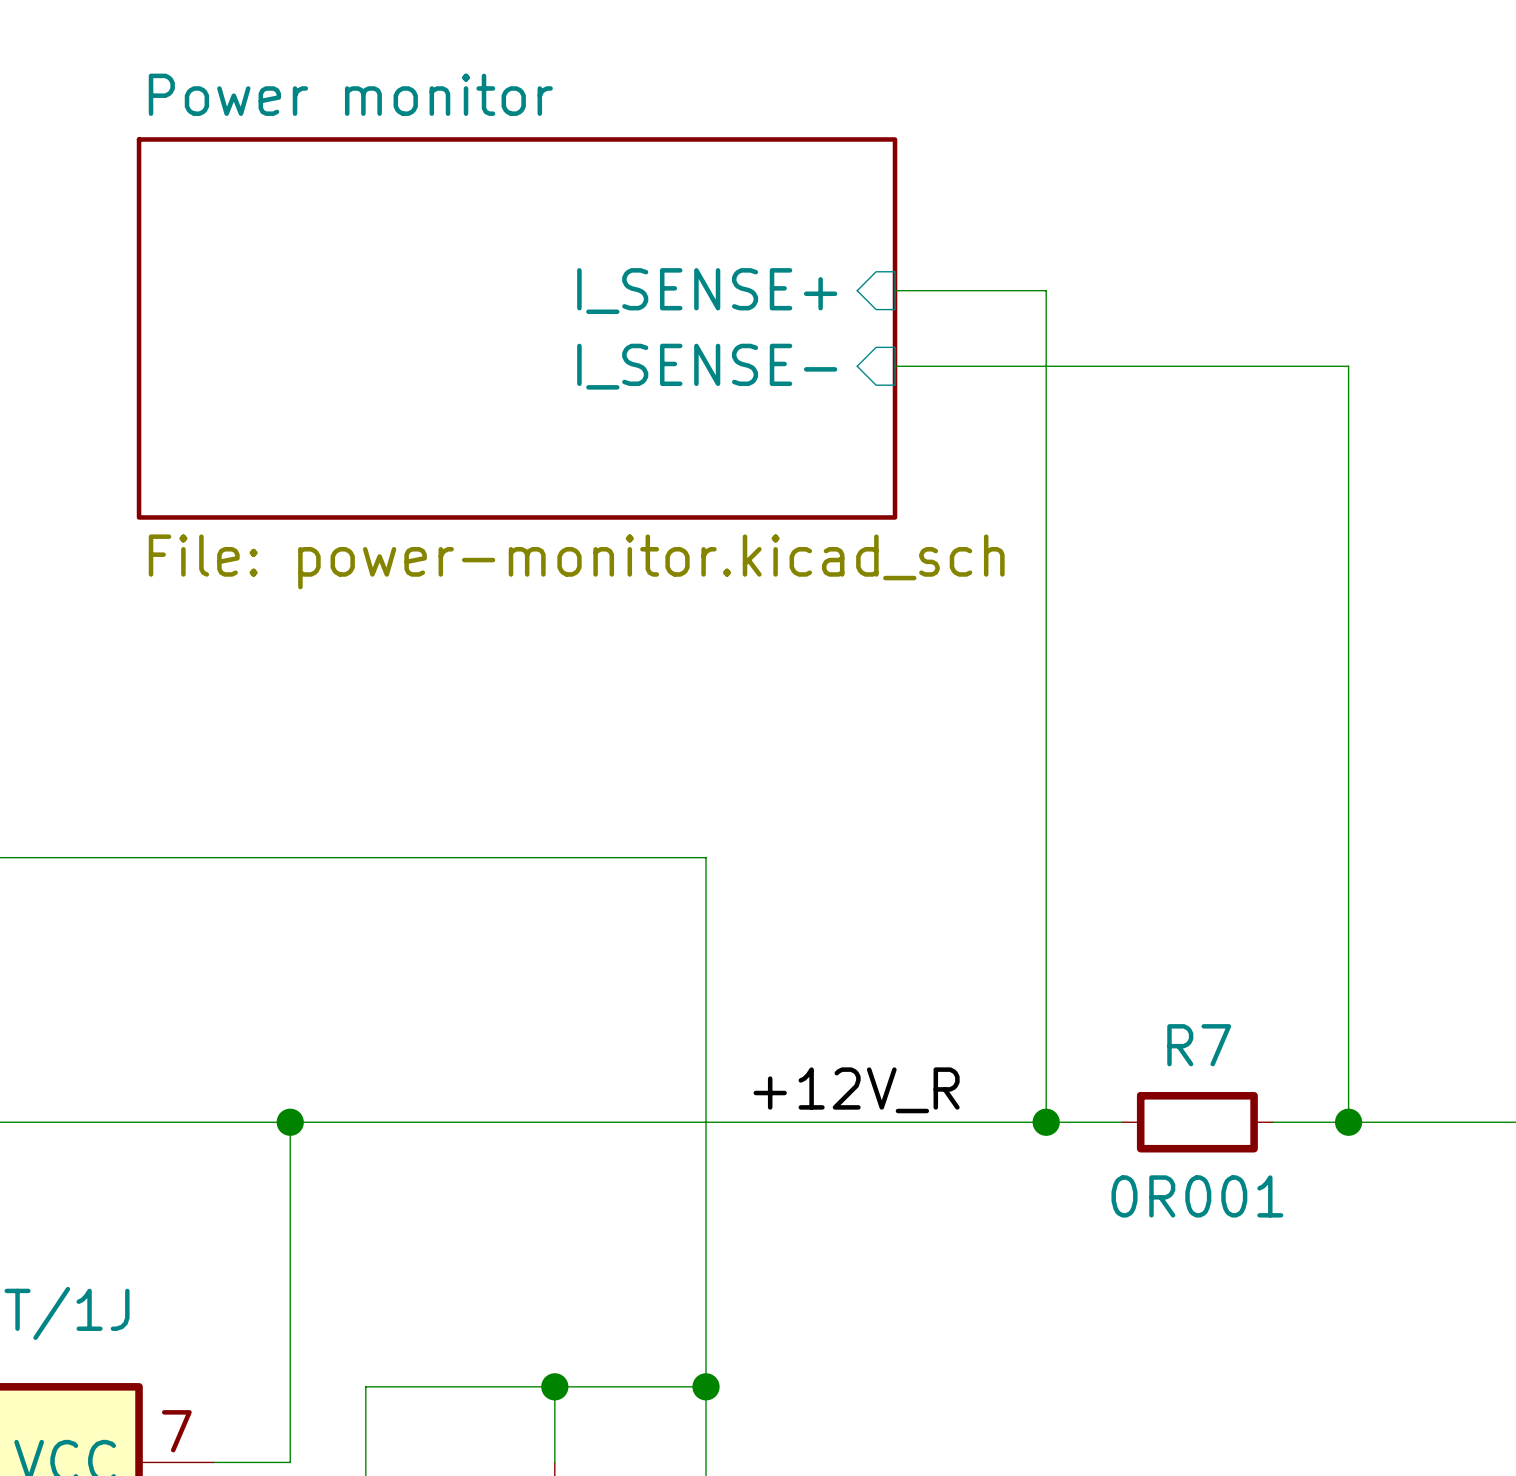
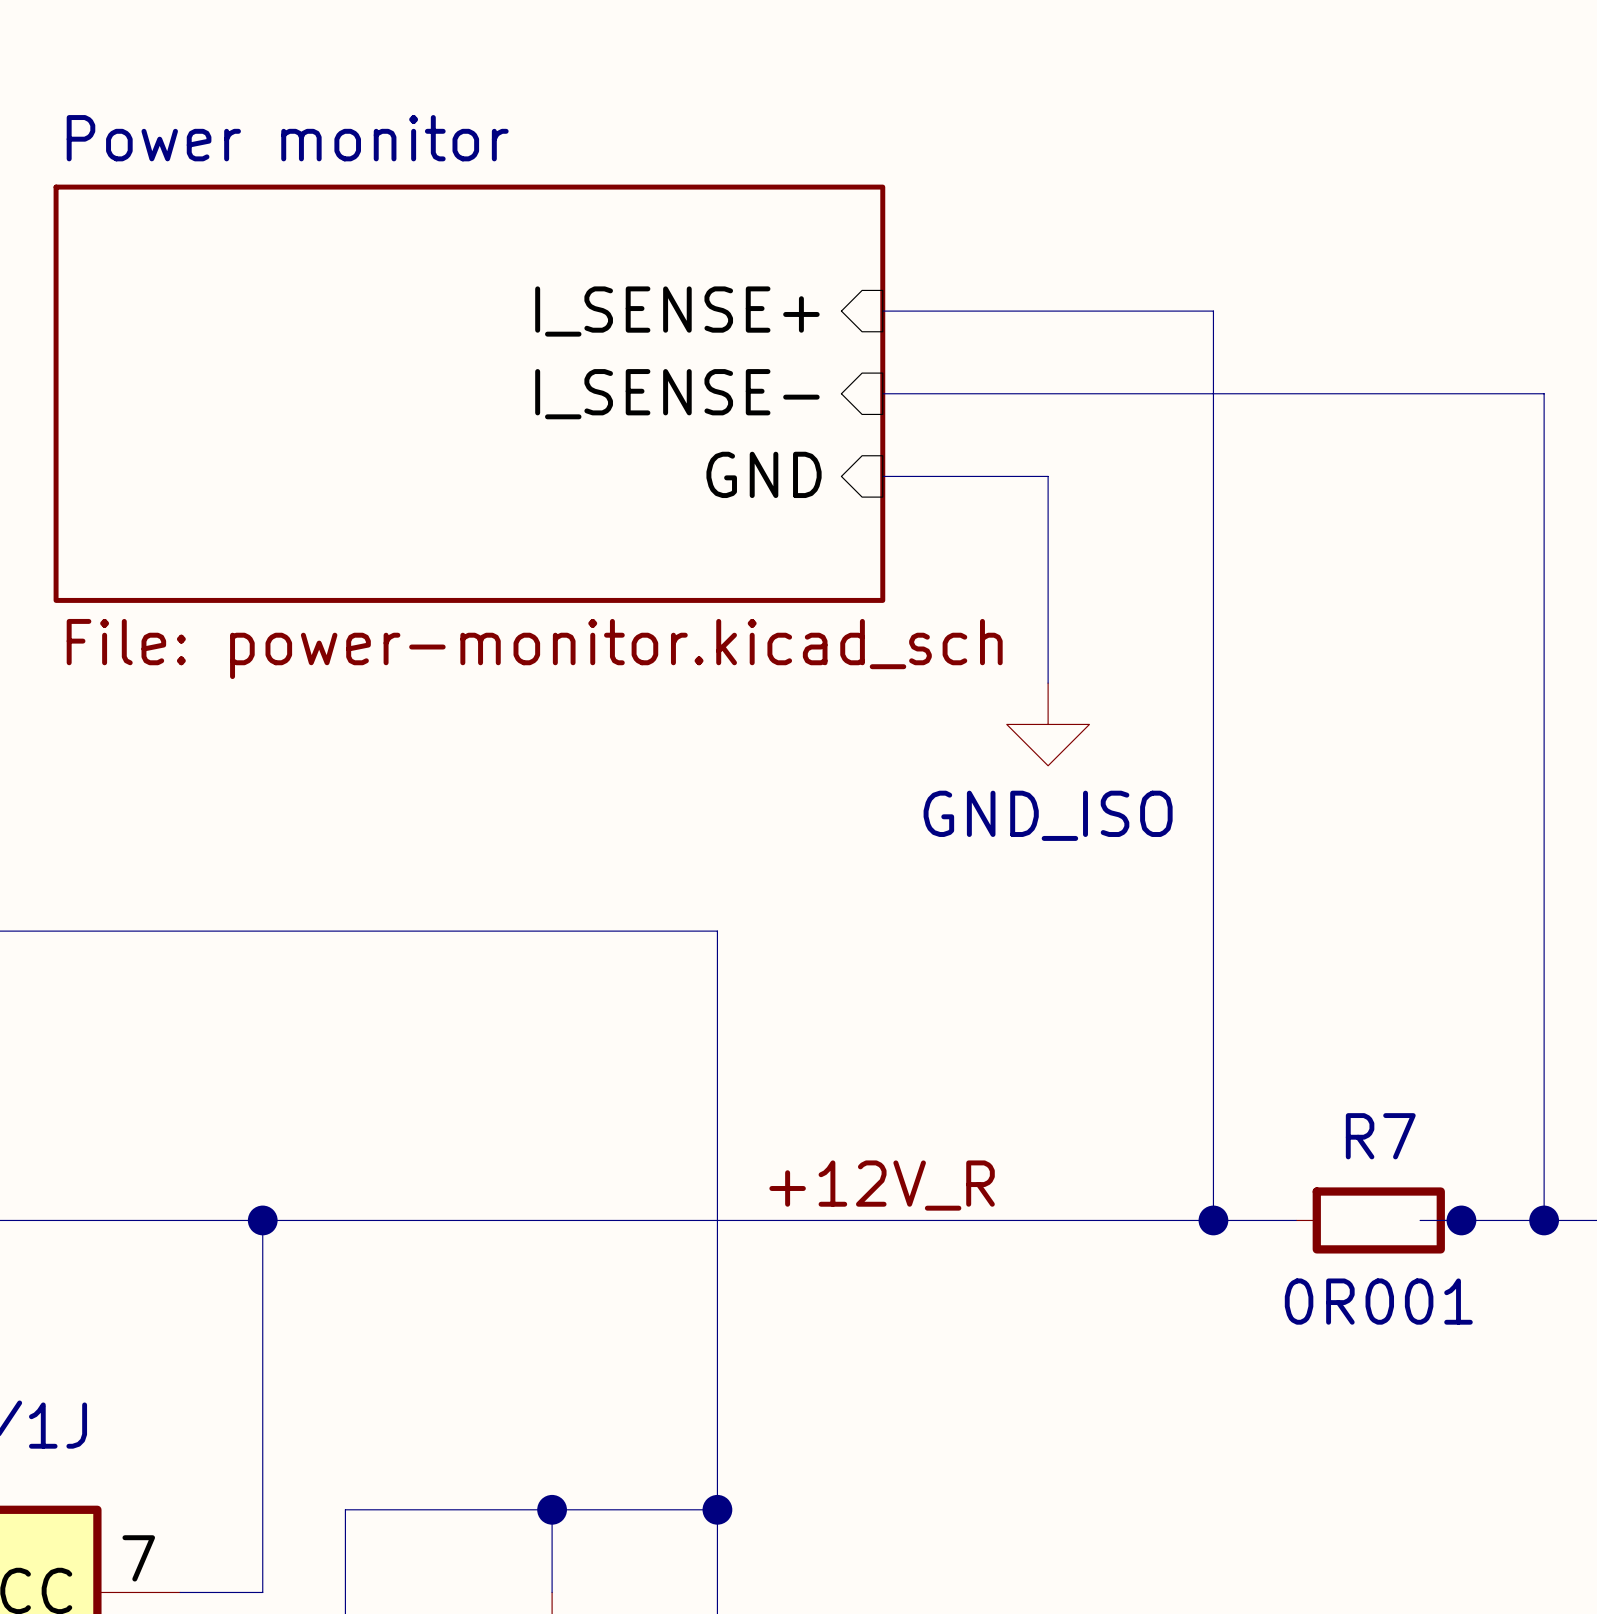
wire: none -> (882, 311) (924, 311)
wire: (1046, 290) (1046, 1122) -> (1089, 311) (1213, 311) (1213, 1220)
sheet pin position: I_SENSE+ (707, 291) -> I_SENSE+ (677, 311)
sheet Power monitor position: (517, 328) -> (469, 393)
sheet pin position: I_SENSE- (707, 366) -> I_SENSE- (677, 394)
wire: none -> (882, 393) (924, 393)
wire: (1348, 366) (1348, 1122) (1272, 1122) -> (1420, 393) (1544, 393) (1544, 1220)
sheet pin: none -> GND (764, 474)
wire: none -> (882, 476) (1048, 476) (1048, 683)
power symbol: none -> GND_ISO (1048, 724)
junction: (1046, 1122) -> none
wire: none -> (1172, 1220) (1296, 1220)
junction: none -> (1213, 1220)
R7 position: (1197, 1122) -> (1378, 1220)
junction position: (1348, 1122) -> (1461, 1220)
junction: none -> (1544, 1220)

